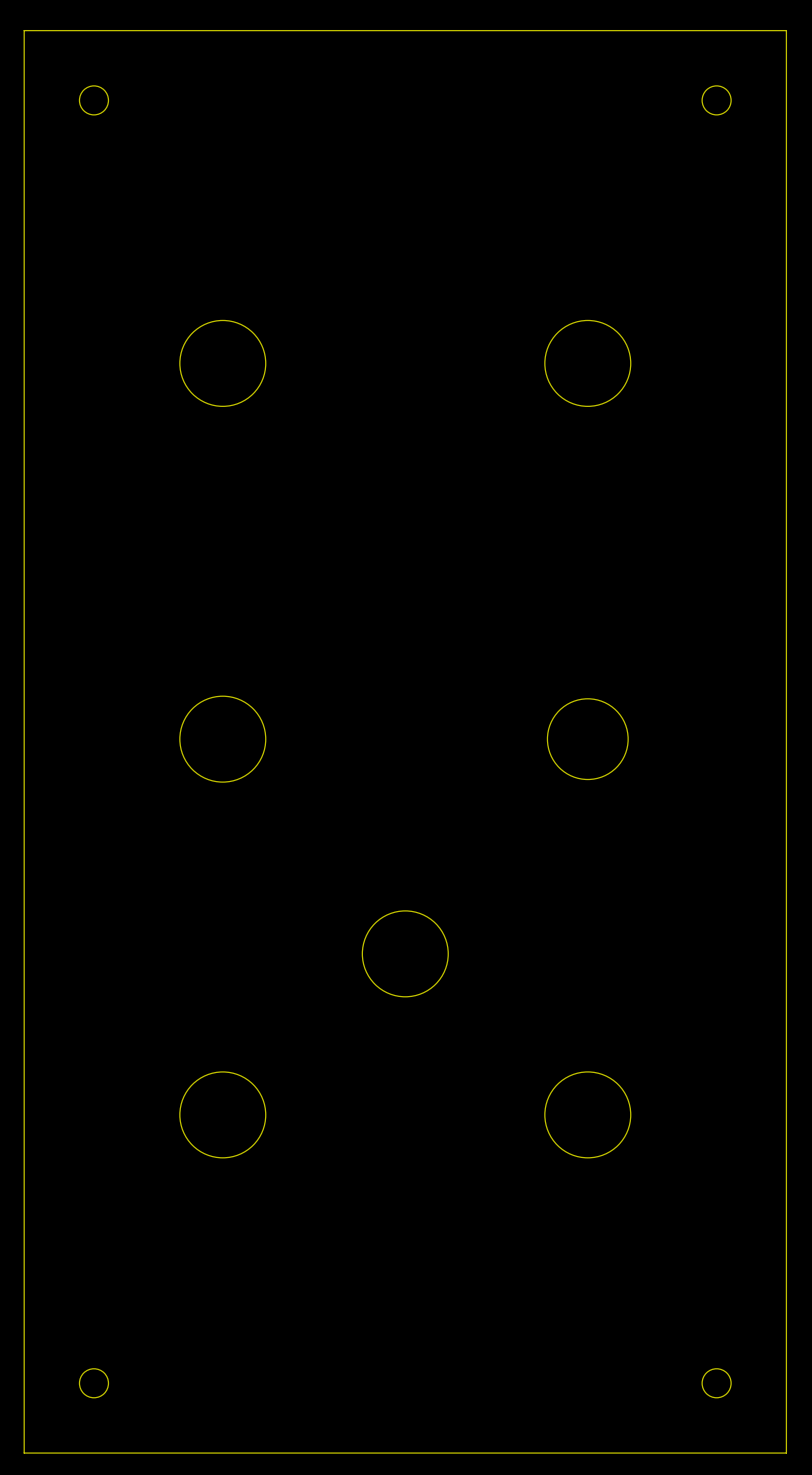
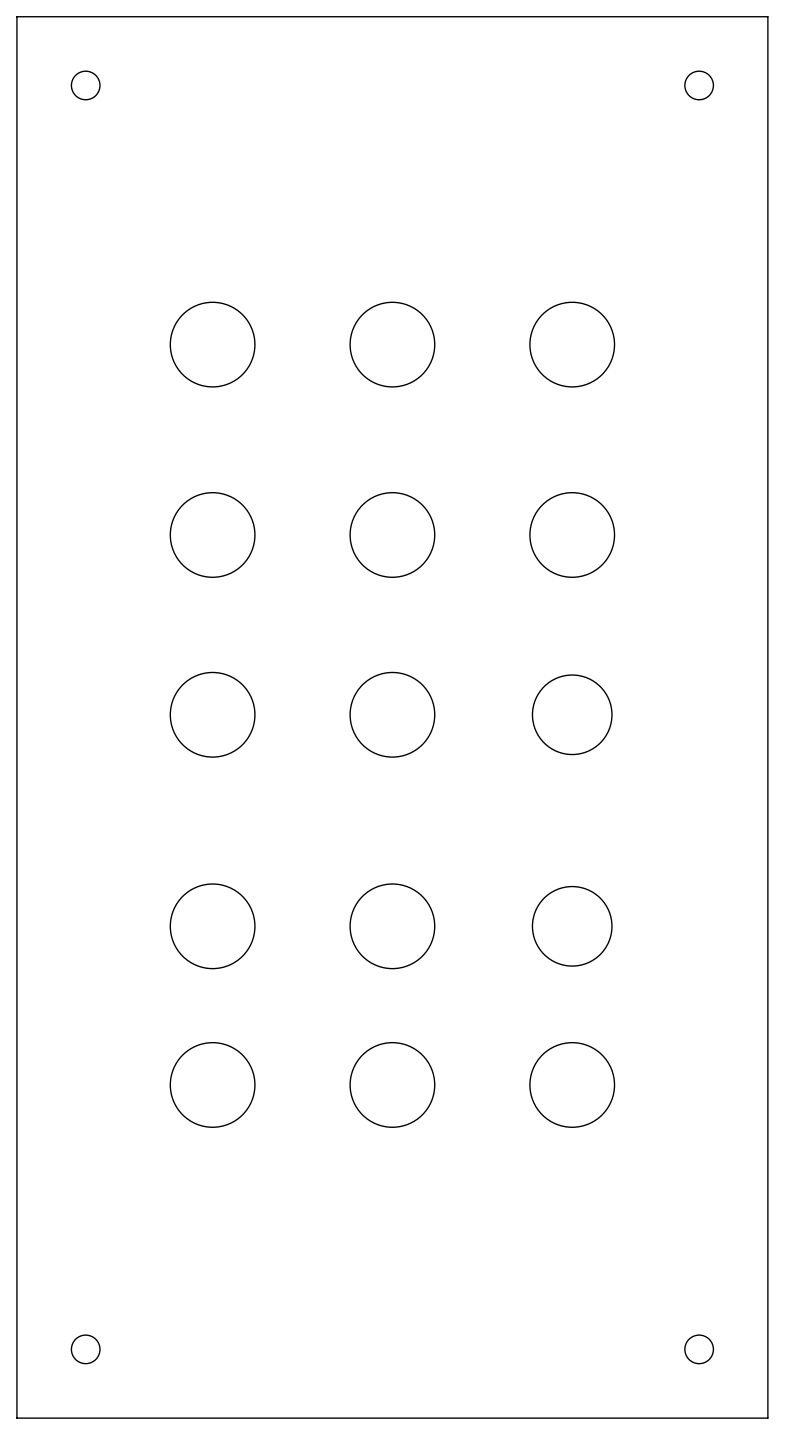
round board edge: none -> [349, 302, 435, 388]
round board edge: none -> [170, 492, 256, 578]
round board edge: none -> [349, 492, 435, 578]
round board edge: none -> [529, 492, 615, 578]
round board edge: none -> [349, 672, 435, 758]
round board edge: none -> [170, 883, 256, 969]
round board edge: none -> [532, 886, 613, 967]
round board edge: none -> [349, 1042, 435, 1128]

